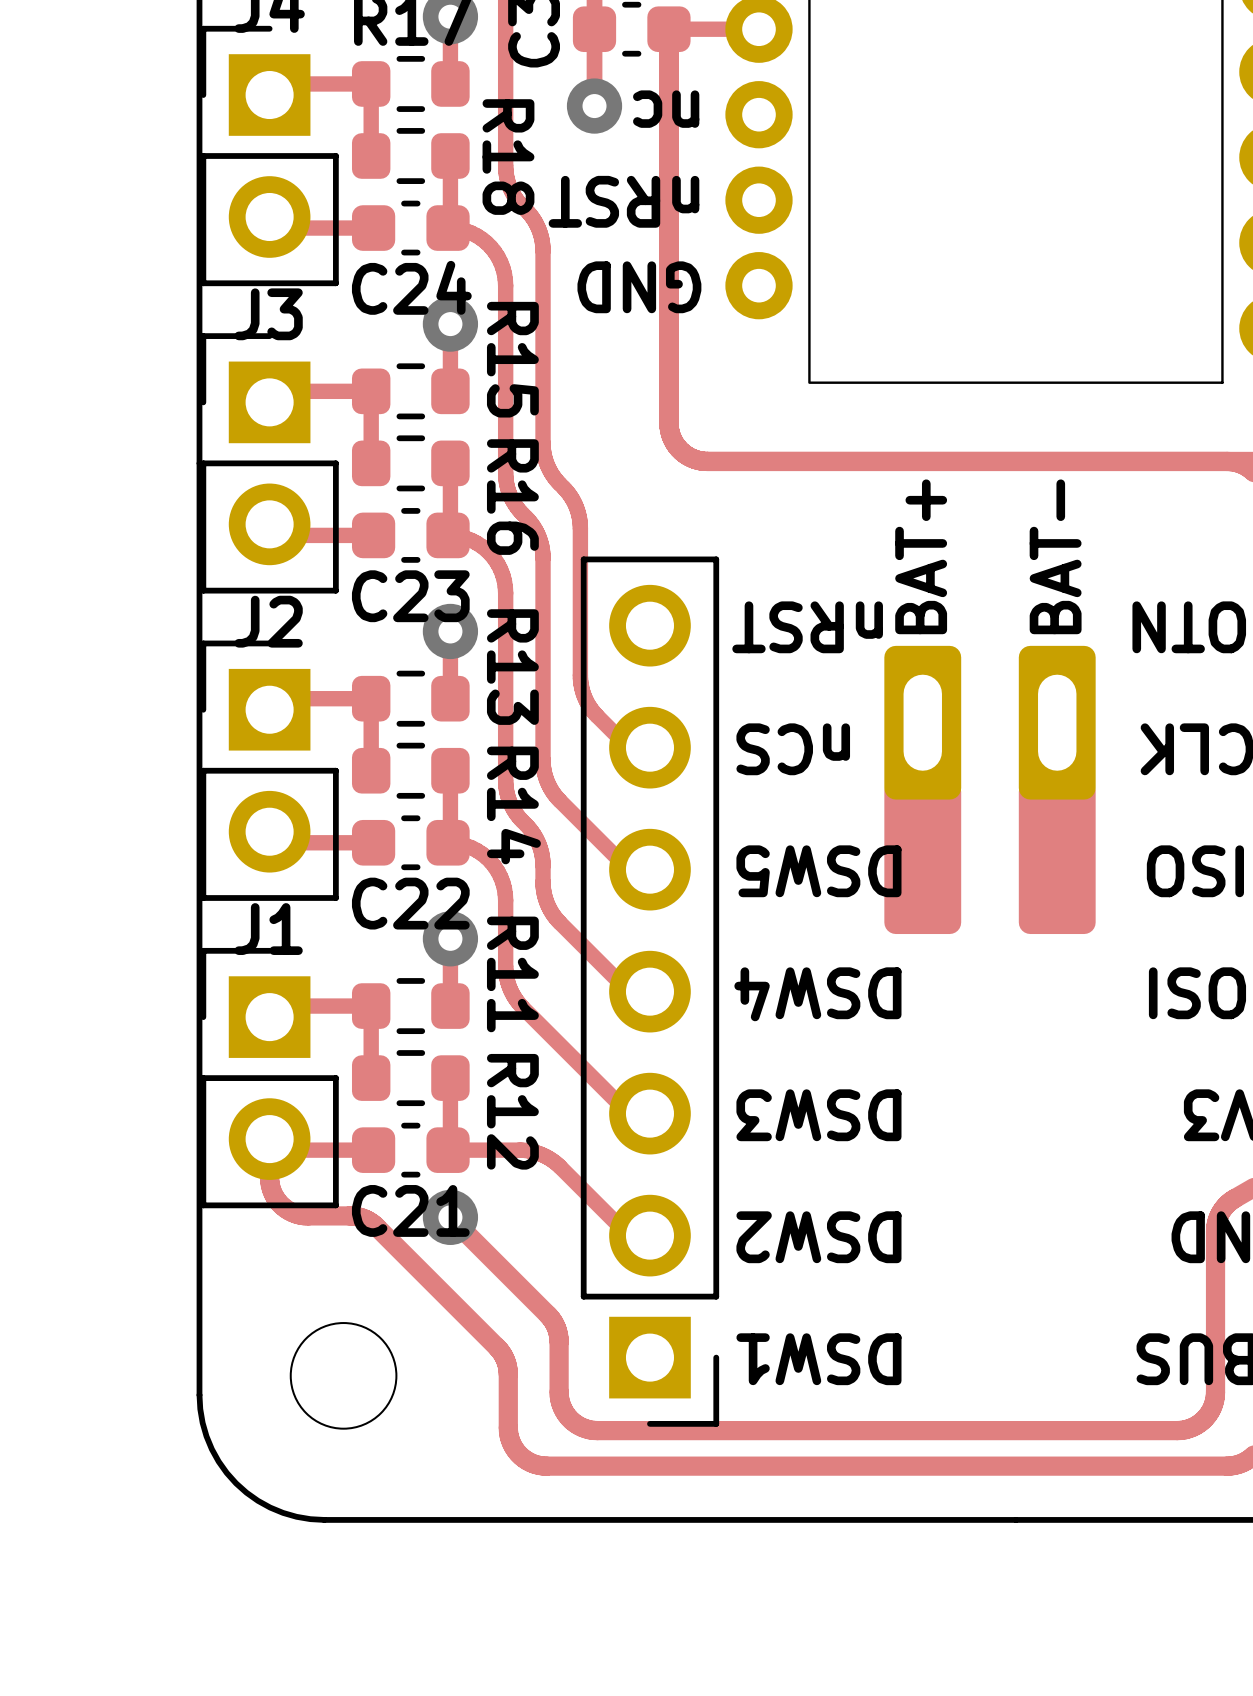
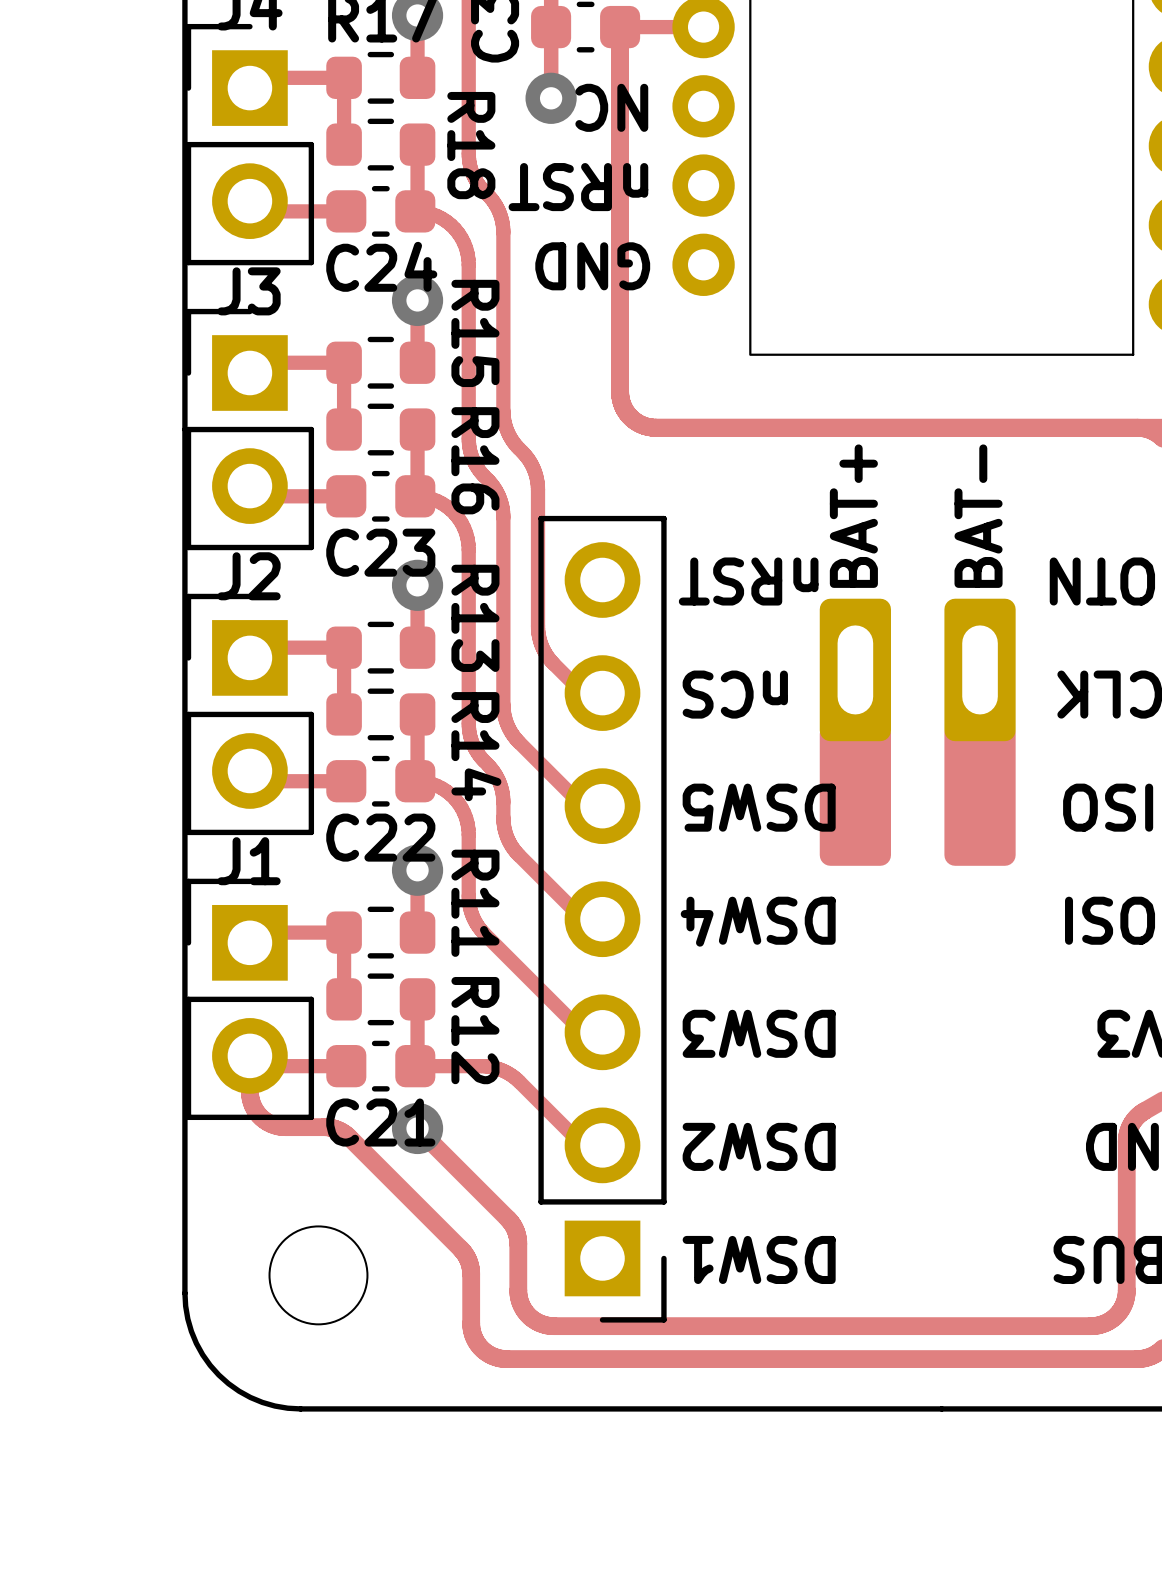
text: nc (666, 109) -> NC (611, 107)

